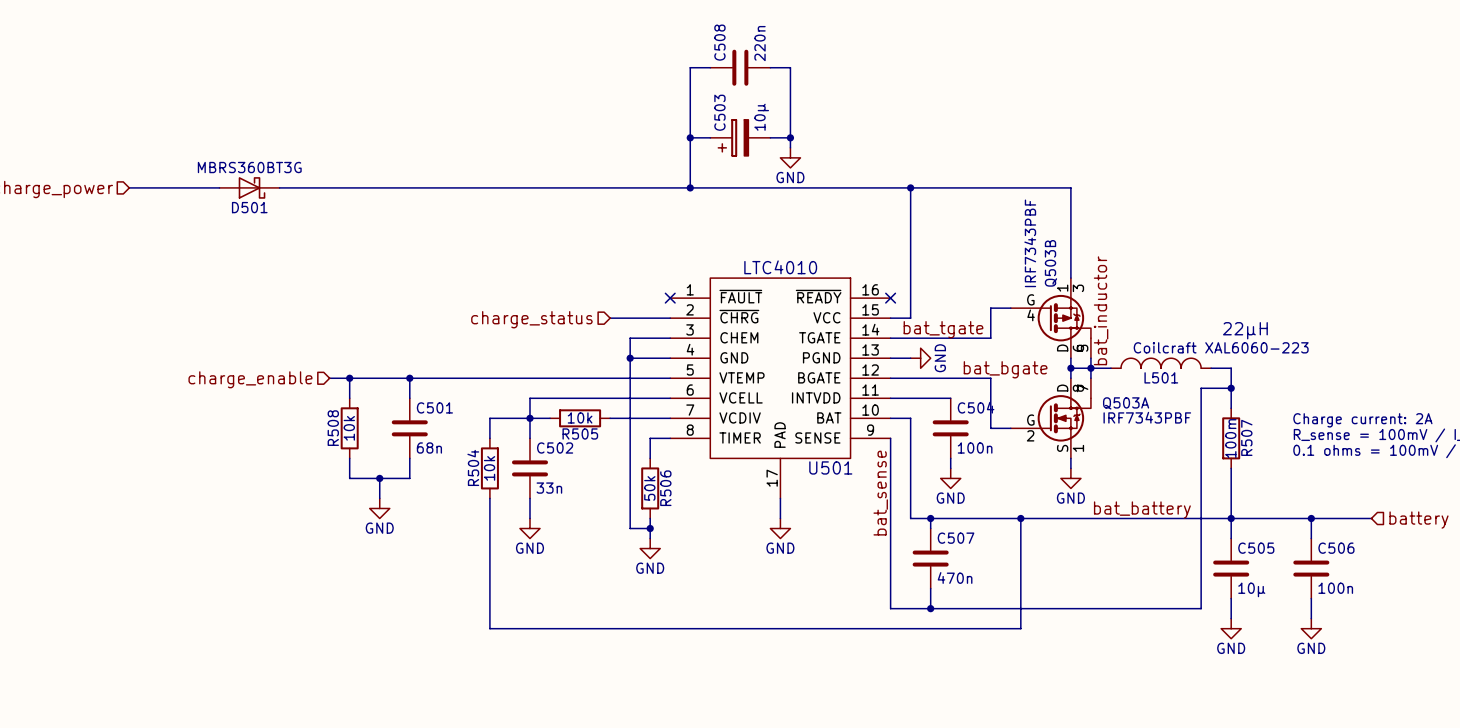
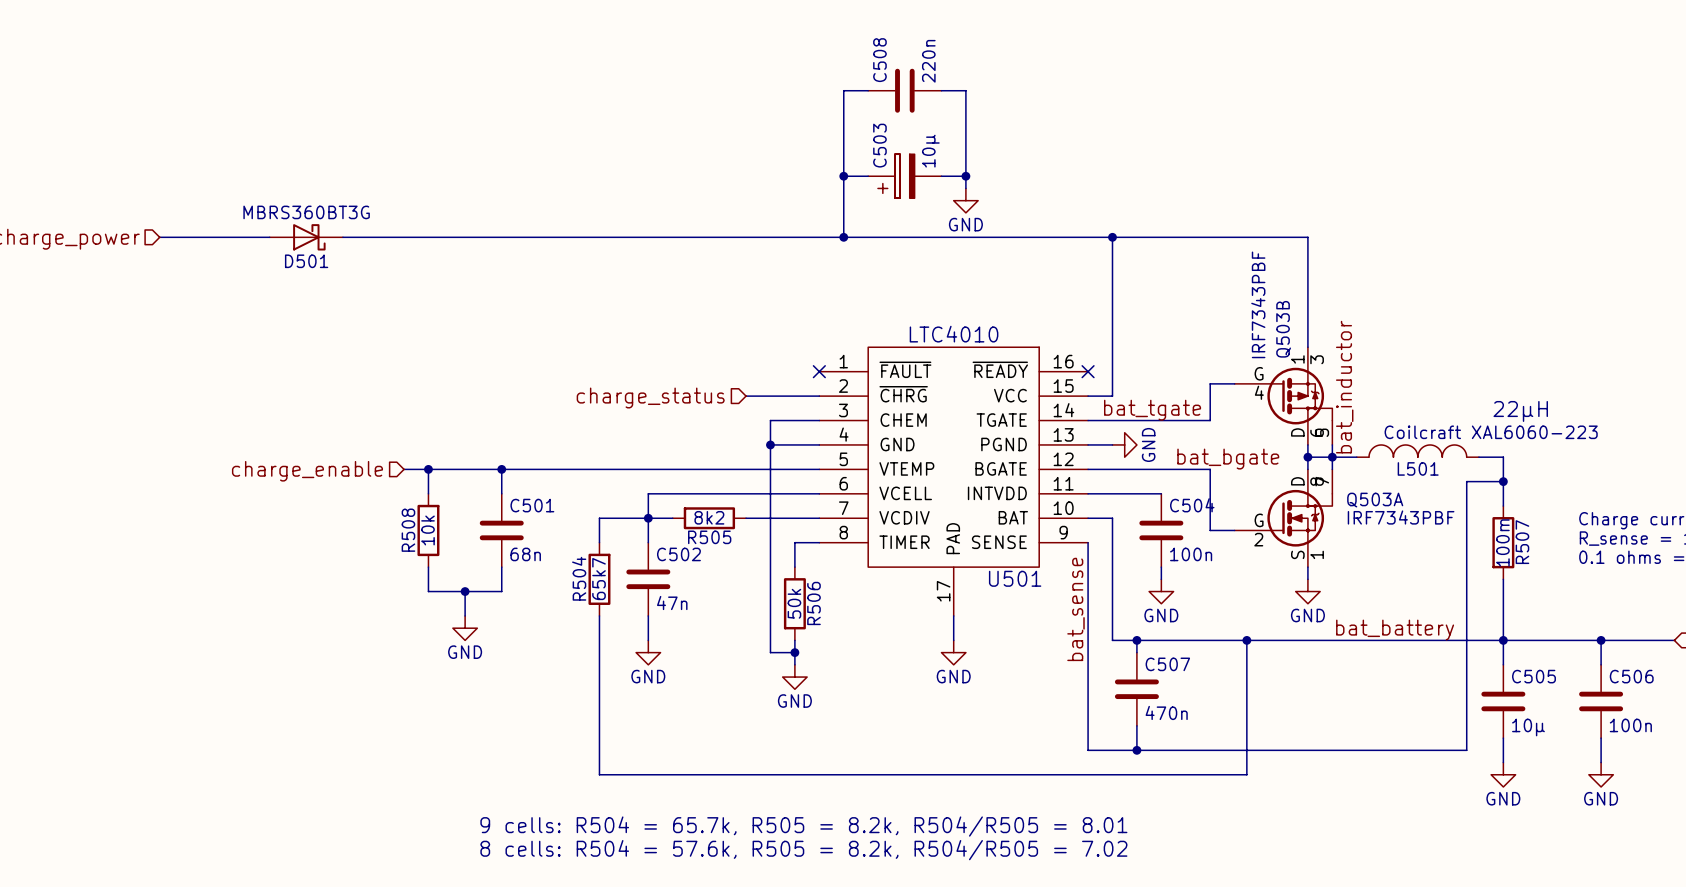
R505 value: 10k (580, 417) -> 8k2 (709, 517)
R504 value: 10k (489, 468) -> 65k7 (599, 579)
C502 value: 33n (549, 488) -> 47n (672, 603)
text: none -> 9 cells: R504 = 65.7k, R505 = 8.2k, R504/R505 = 8.01 (803, 826)
text: none -> 8 cells: R504 = 57.6k, R505 = 8.2k, R504/R505 = 7.02 (803, 850)

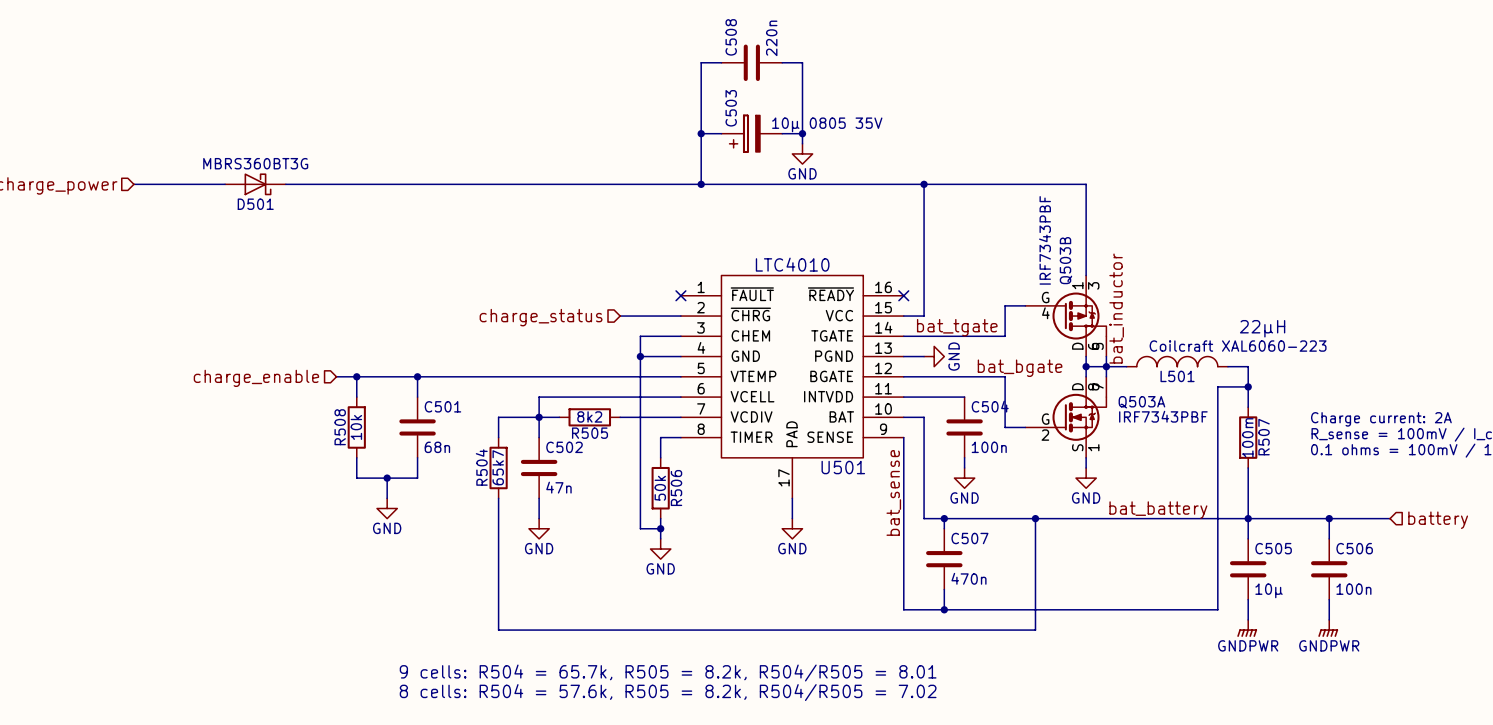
C503 value: 10µ (930, 151) -> 10µ 0805 35V (827, 124)
power symbol: GND (1503, 774) -> GNDPWR (1247, 628)
power symbol: GND (1601, 774) -> GNDPWR (1328, 628)

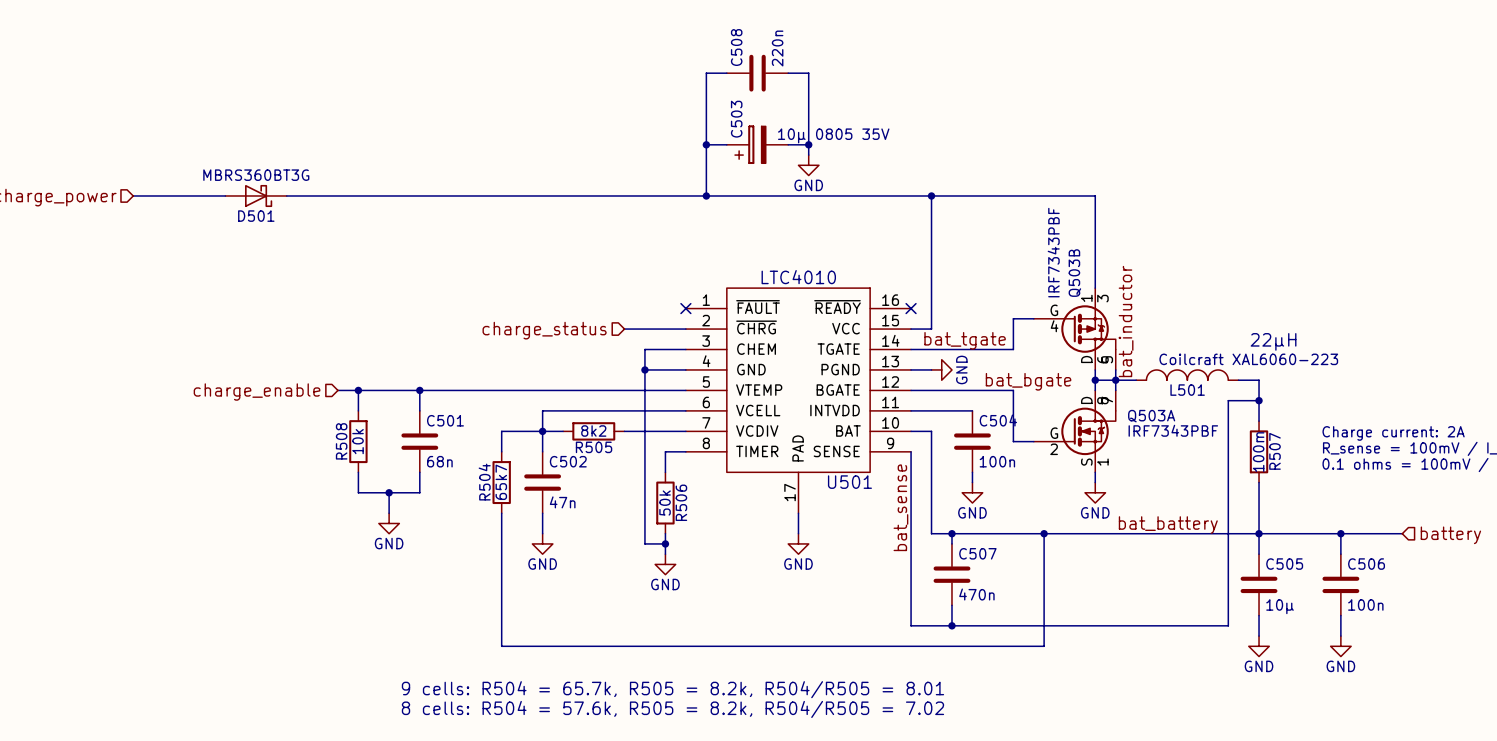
power symbol: GNDPWR (1247, 628) -> GND (1259, 646)
power symbol: GNDPWR (1328, 628) -> GND (1340, 646)

